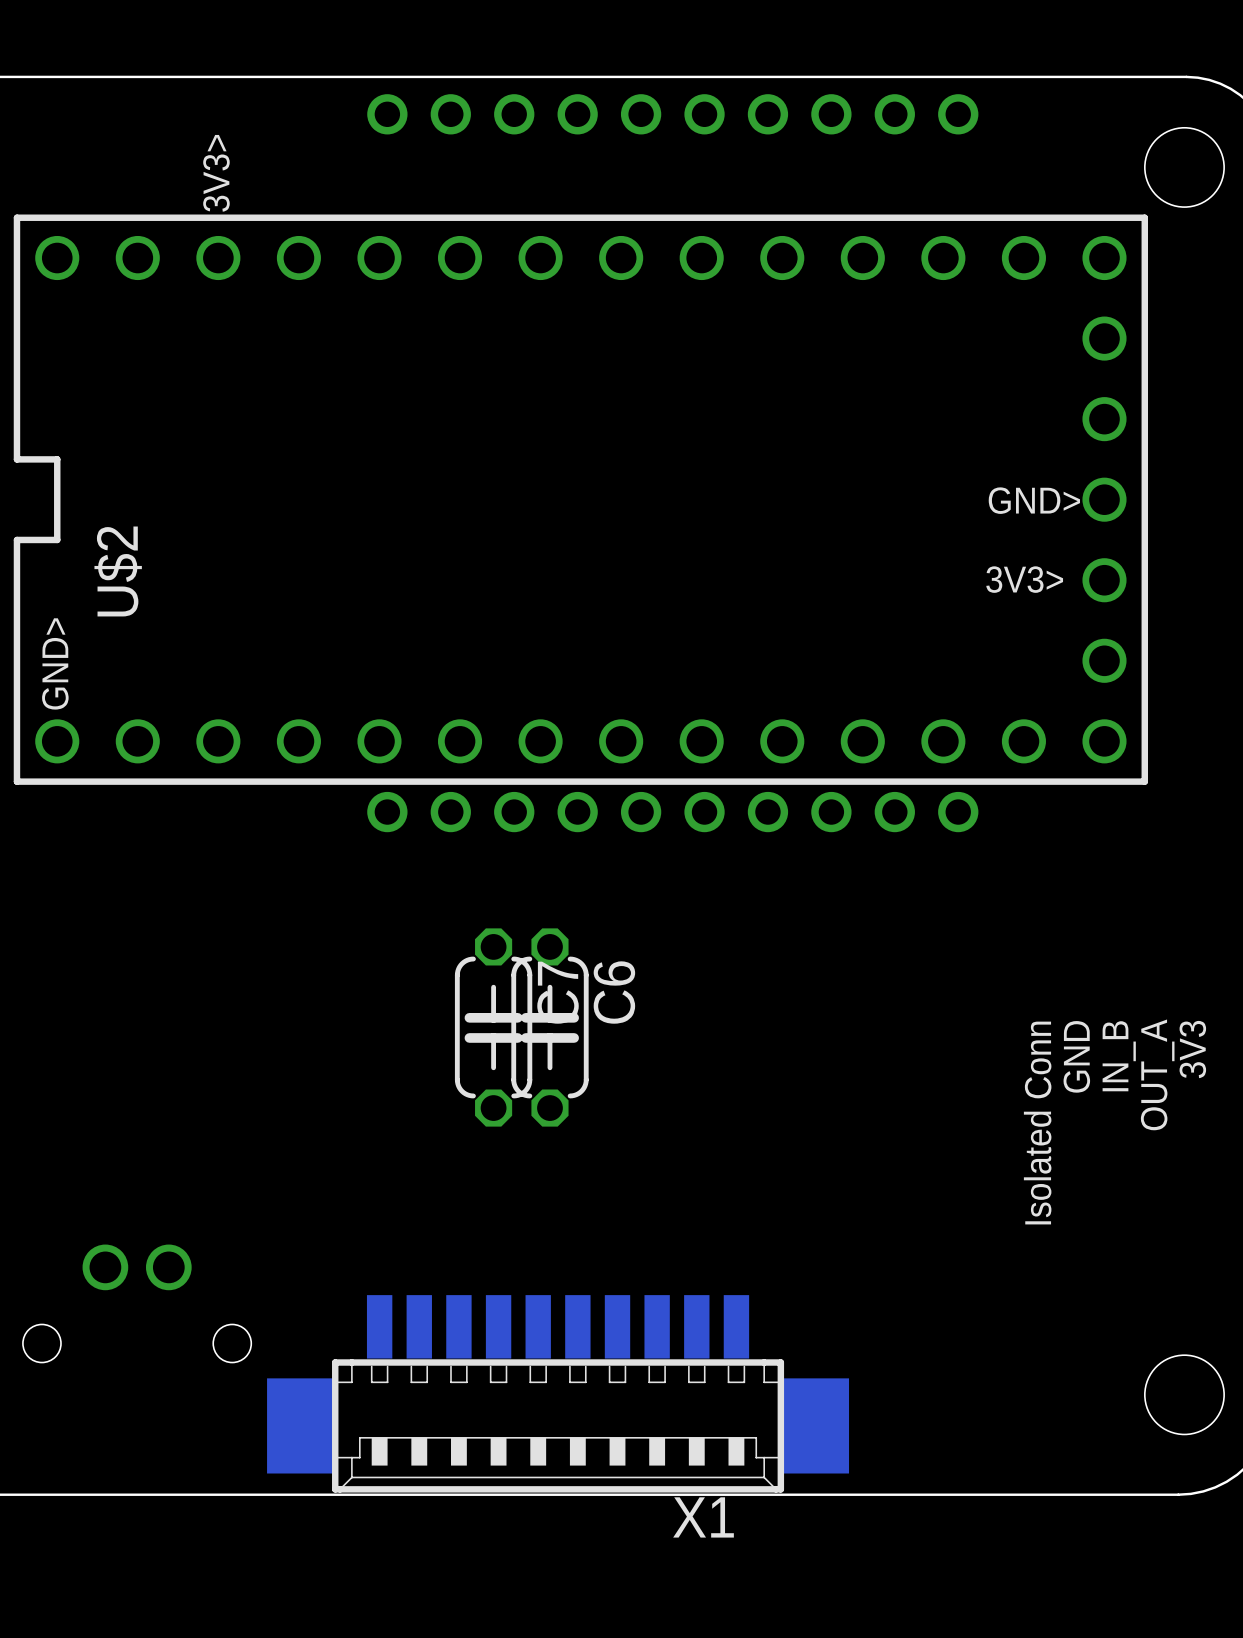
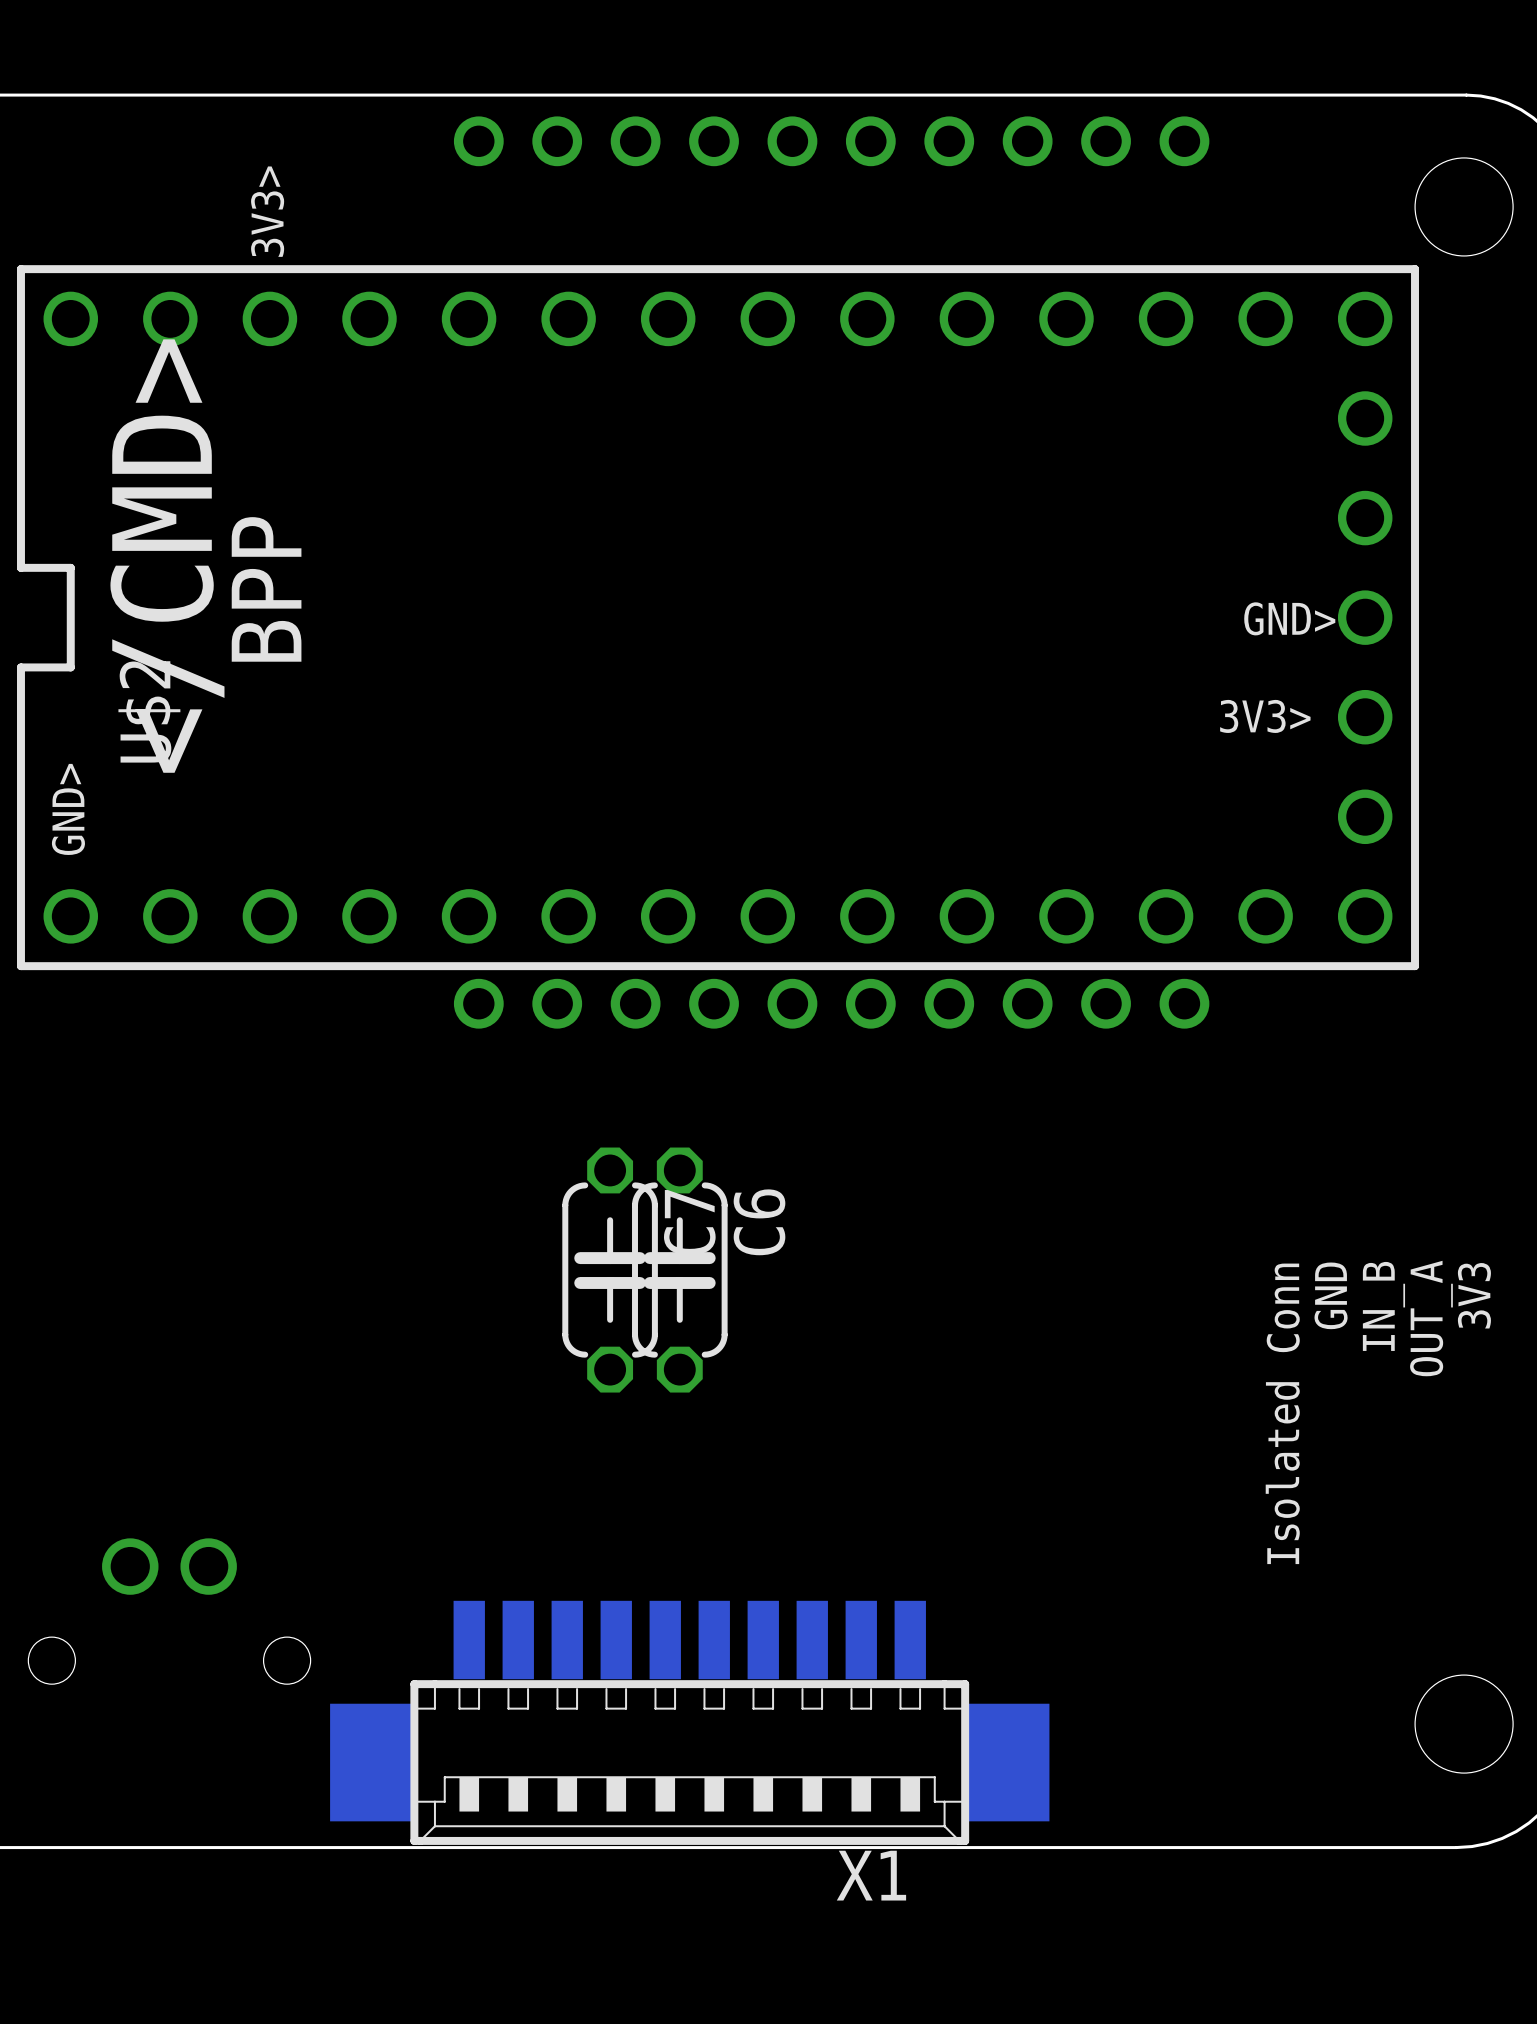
text: none -> </CMD> (167, 556)
text: none -> BPP (266, 589)

